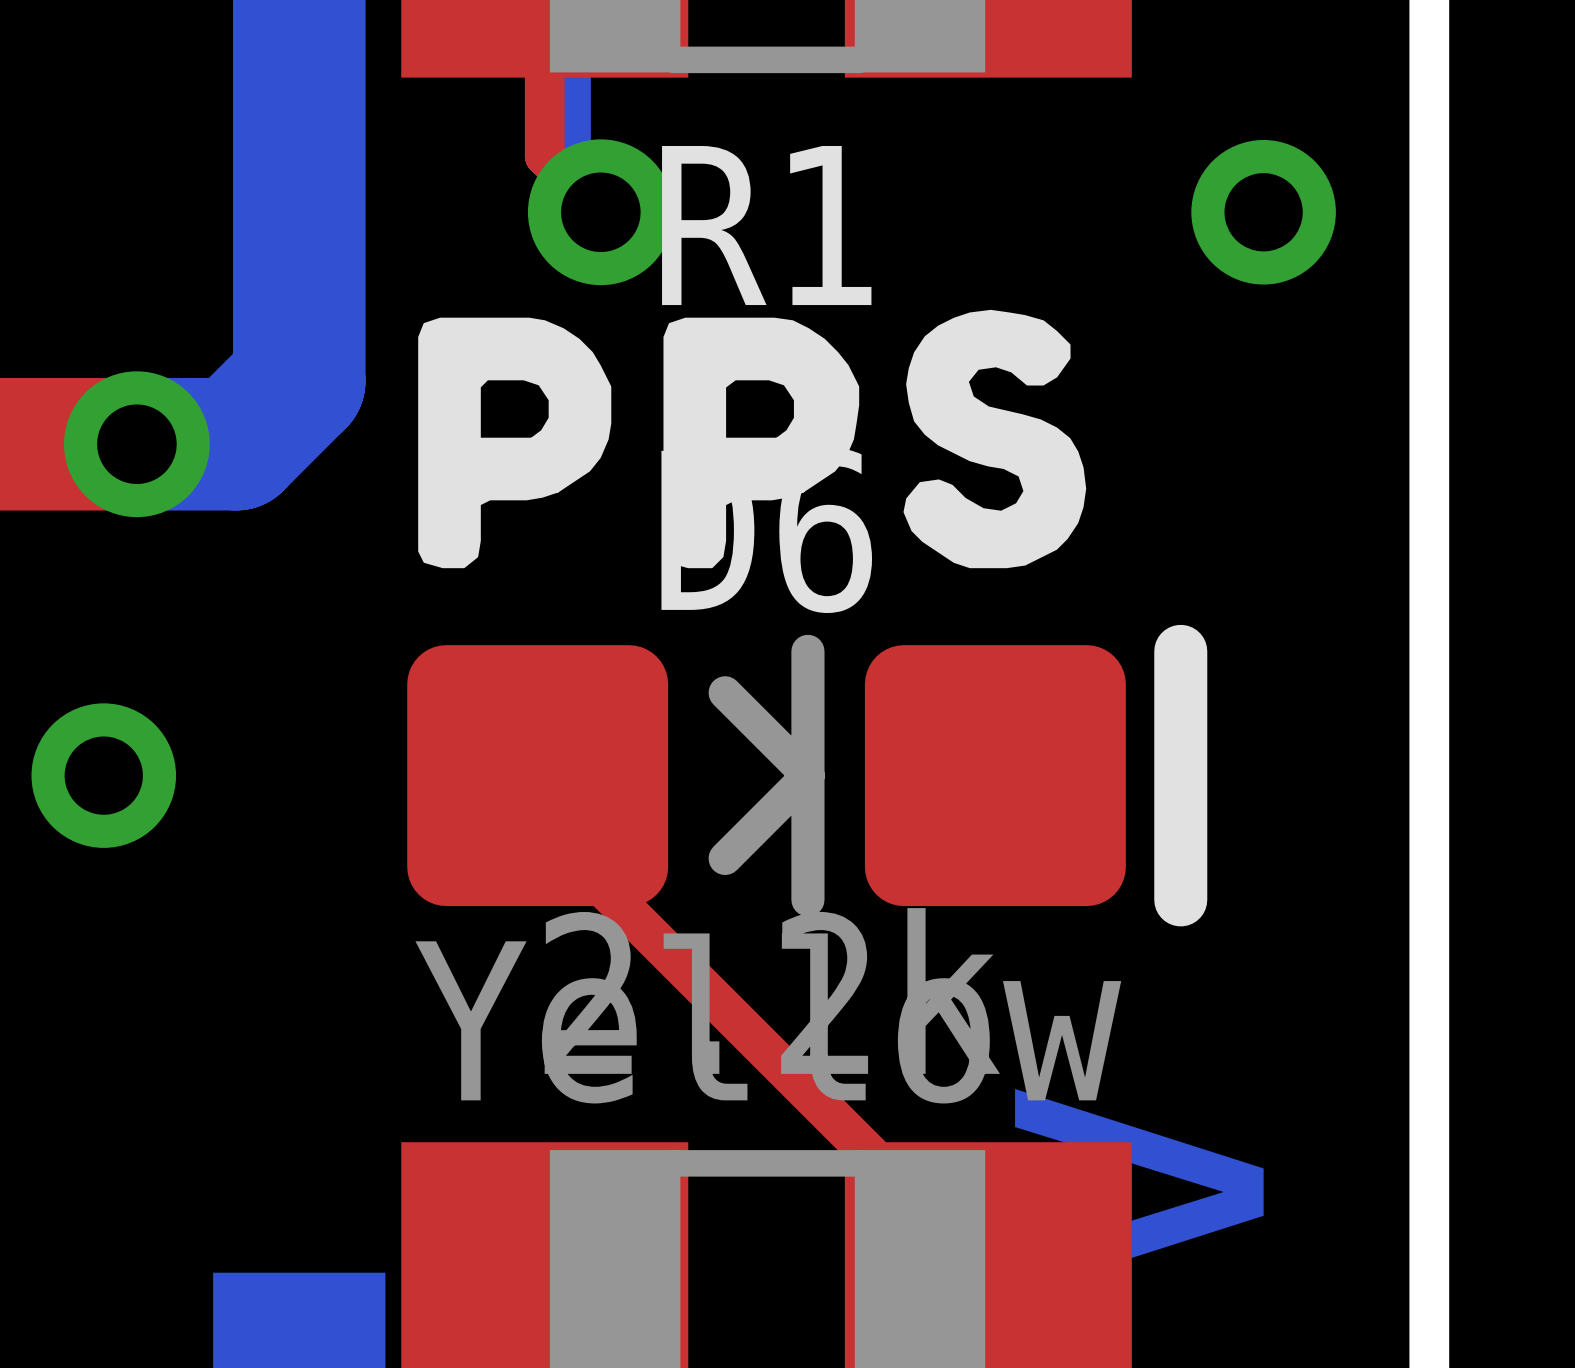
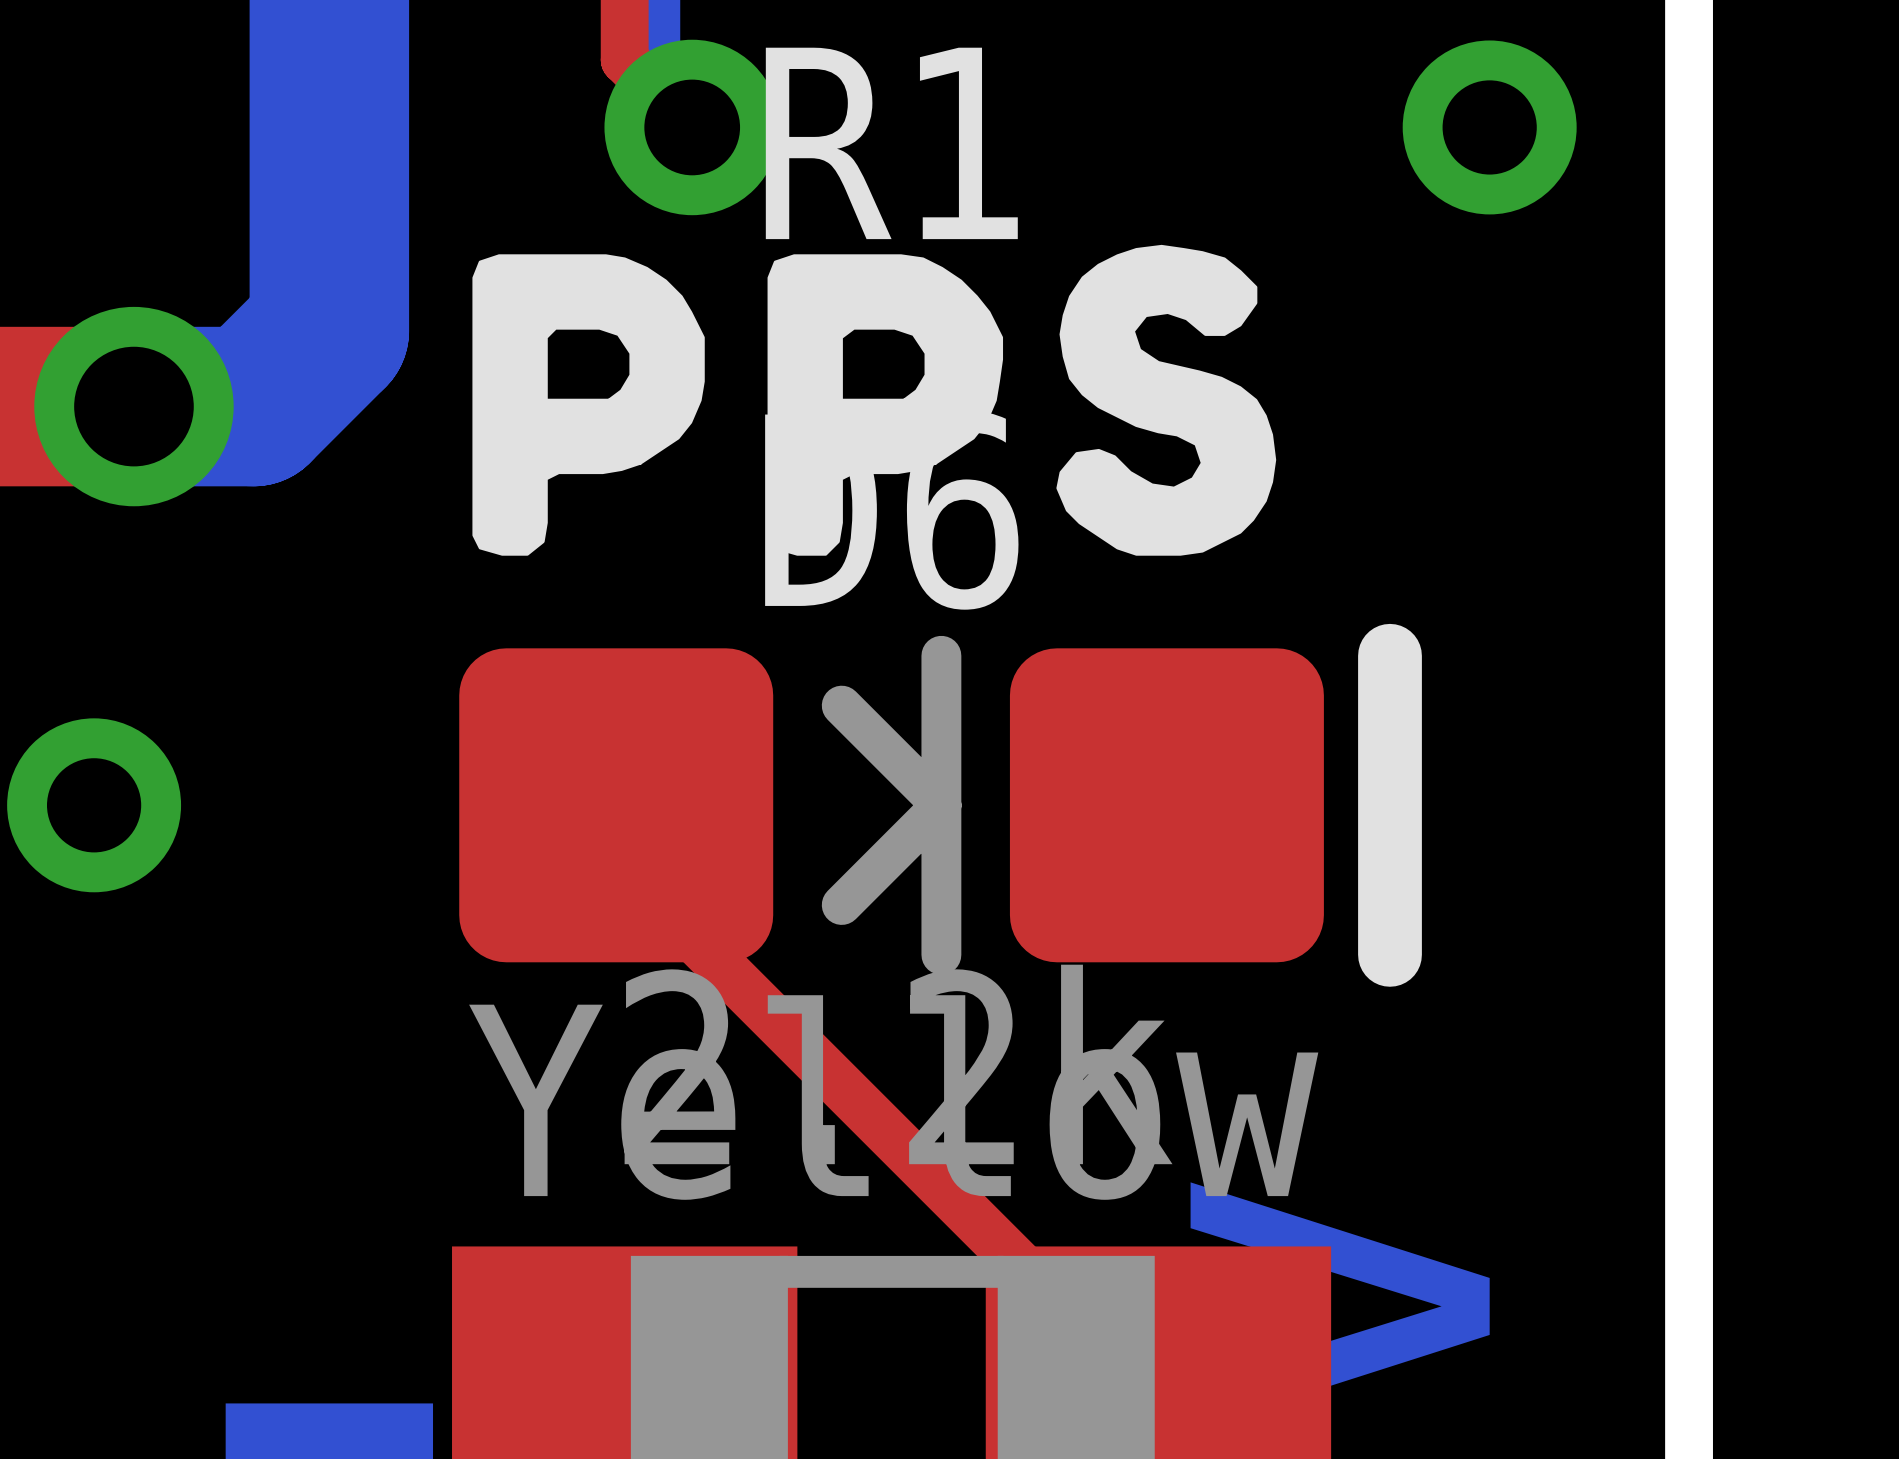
via size: [64, 371, 210, 518] -> [34, 306, 234, 507]

